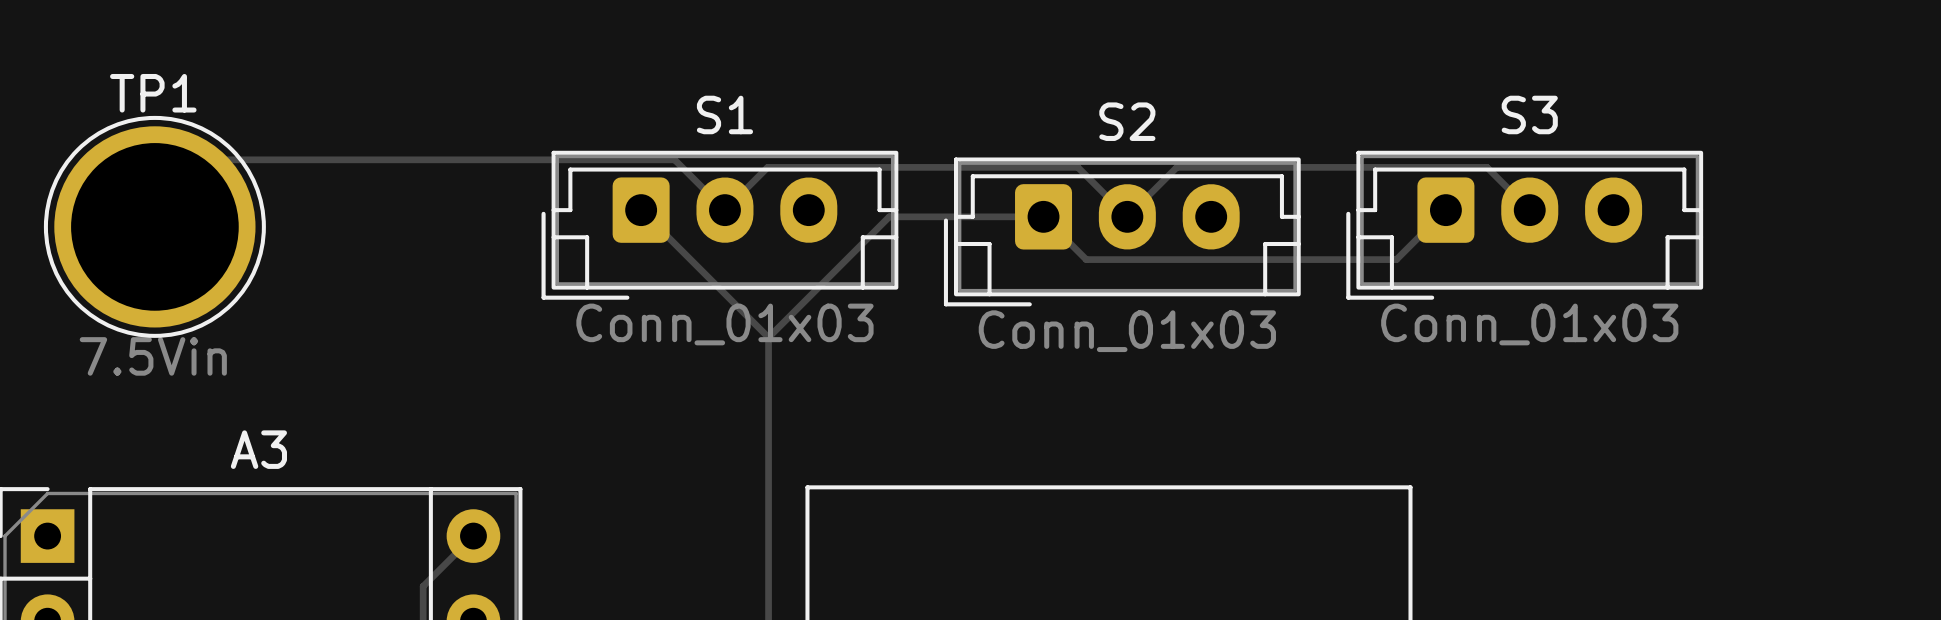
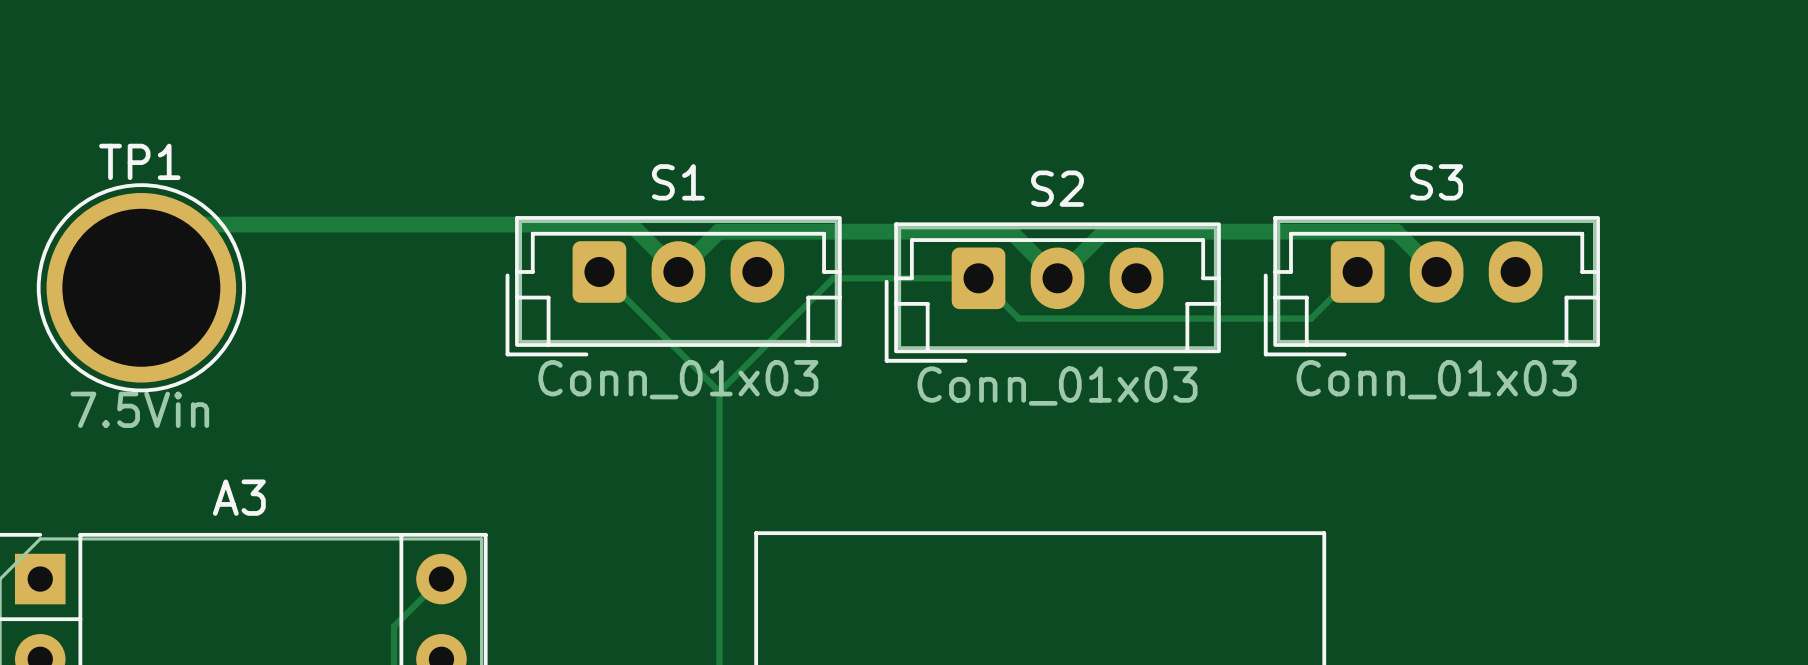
track width: thin (1529, 210) (1487, 167) (1176, 167) (1127, 216) (1077, 167) (767, 167) (724, 210) (674, 159) (221, 159) (154, 226) -> thick (1436, 271) (1396, 231) (1104, 231) (1057, 278) (1010, 231) (718, 231) (678, 271) (631, 224) (204, 224) (141, 287)

